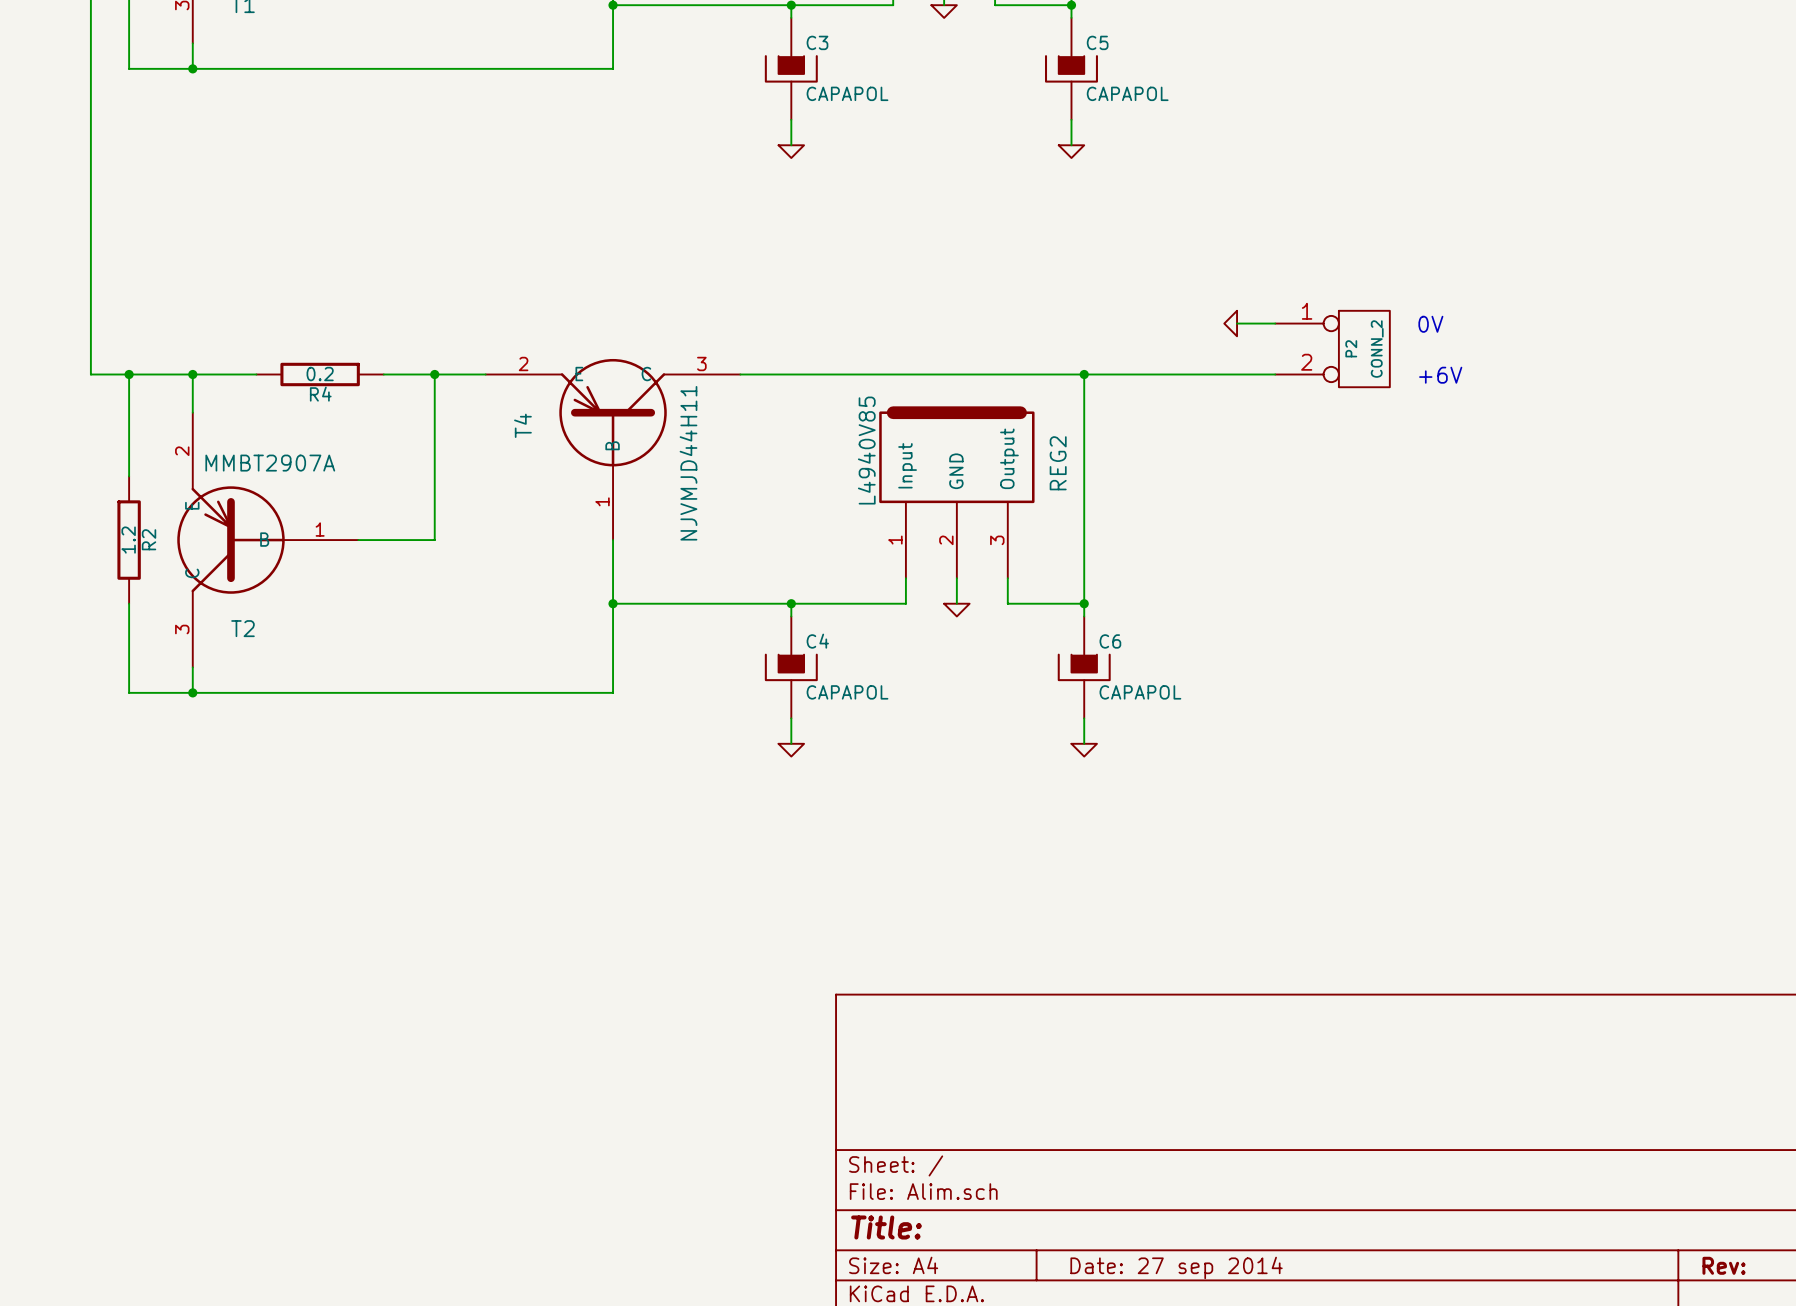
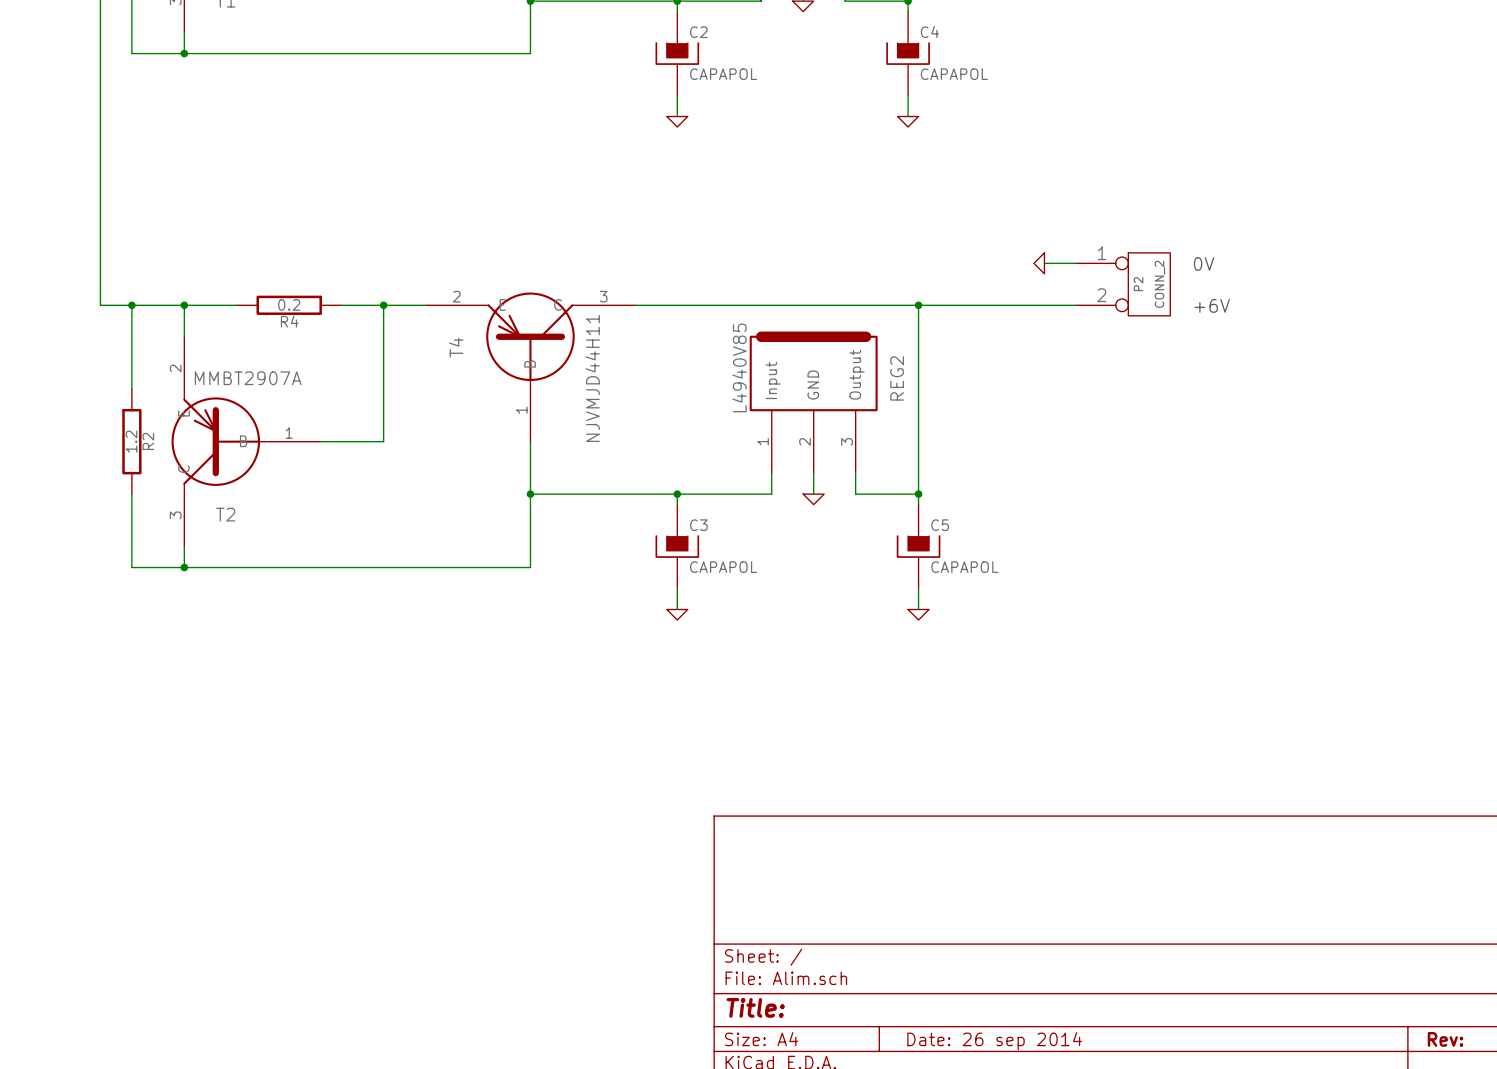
C3 name: C3 (817, 42) -> C2 (698, 32)
C5 name: C5 (1097, 42) -> C4 (929, 31)
C4 name: C4 (817, 641) -> C3 (698, 525)
C6 name: C6 (1110, 641) -> C5 (940, 525)
title block: Date: 27 sep 2014 (1176, 1267) -> Date: 26 sep 2014 (994, 1041)

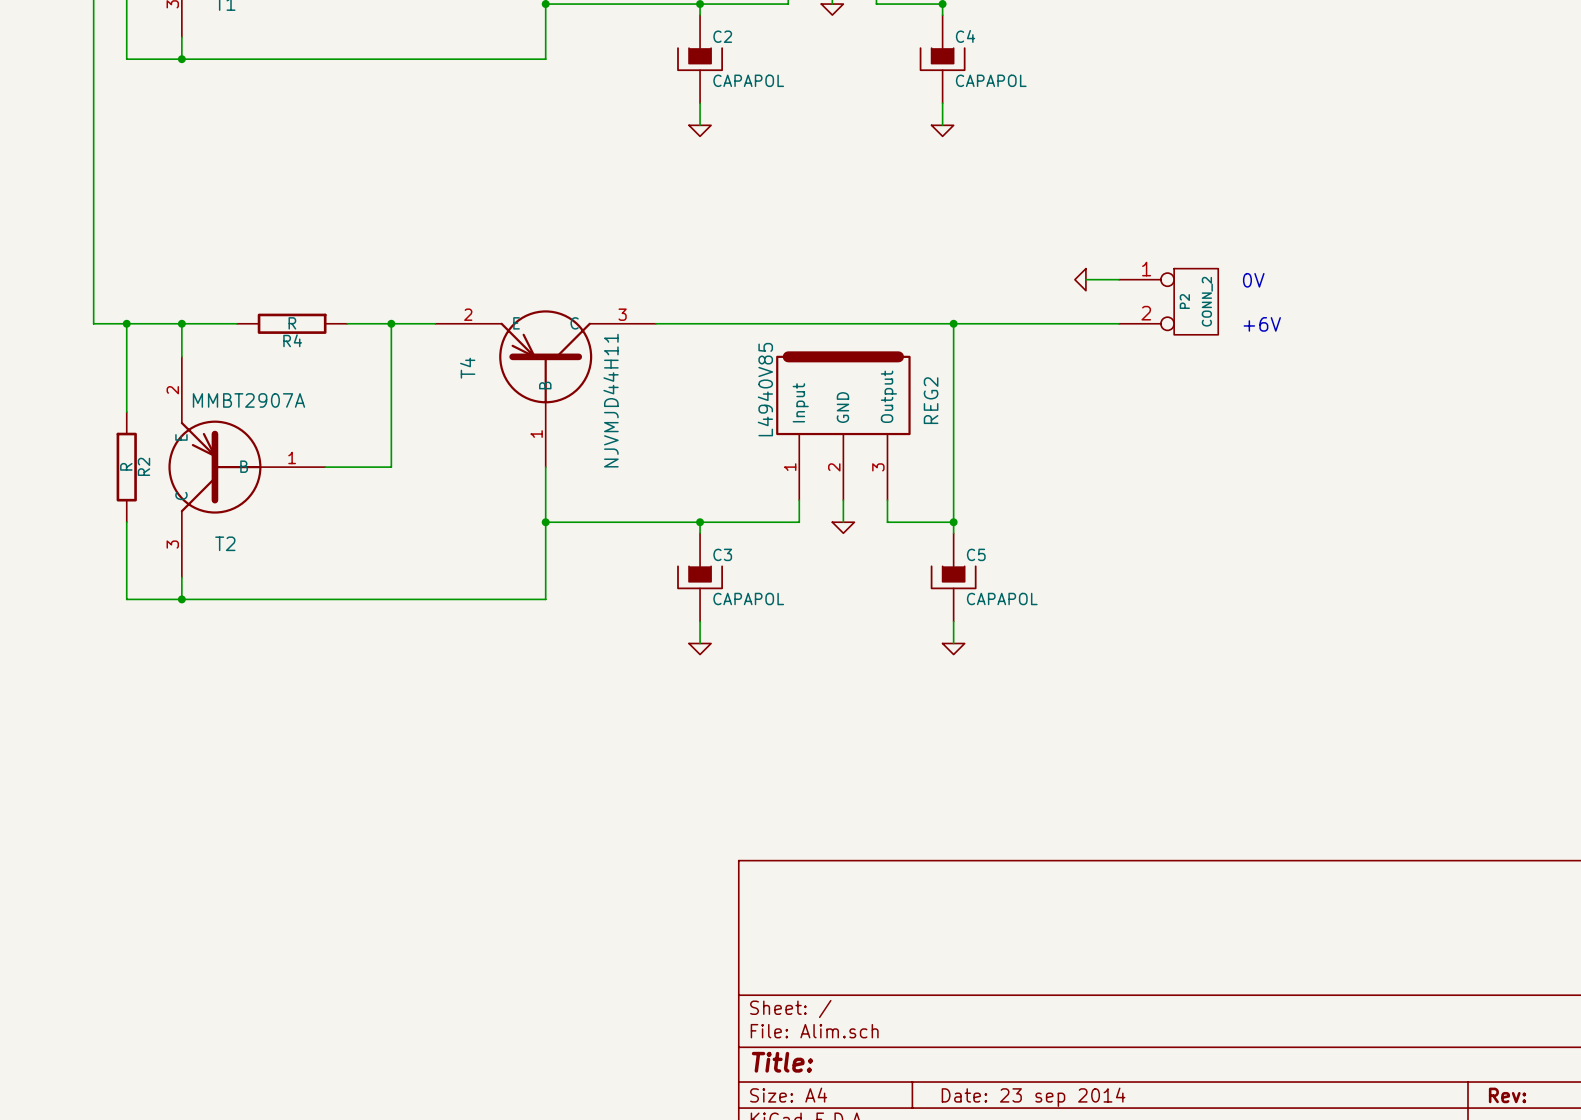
R4 value: 0.2 (289, 304) -> R (292, 323)
R2 value: 1.2 (131, 441) -> R (126, 466)
title block: Date: 26 sep 2014 (994, 1041) -> Date: 23 sep 2014 (1033, 1097)

